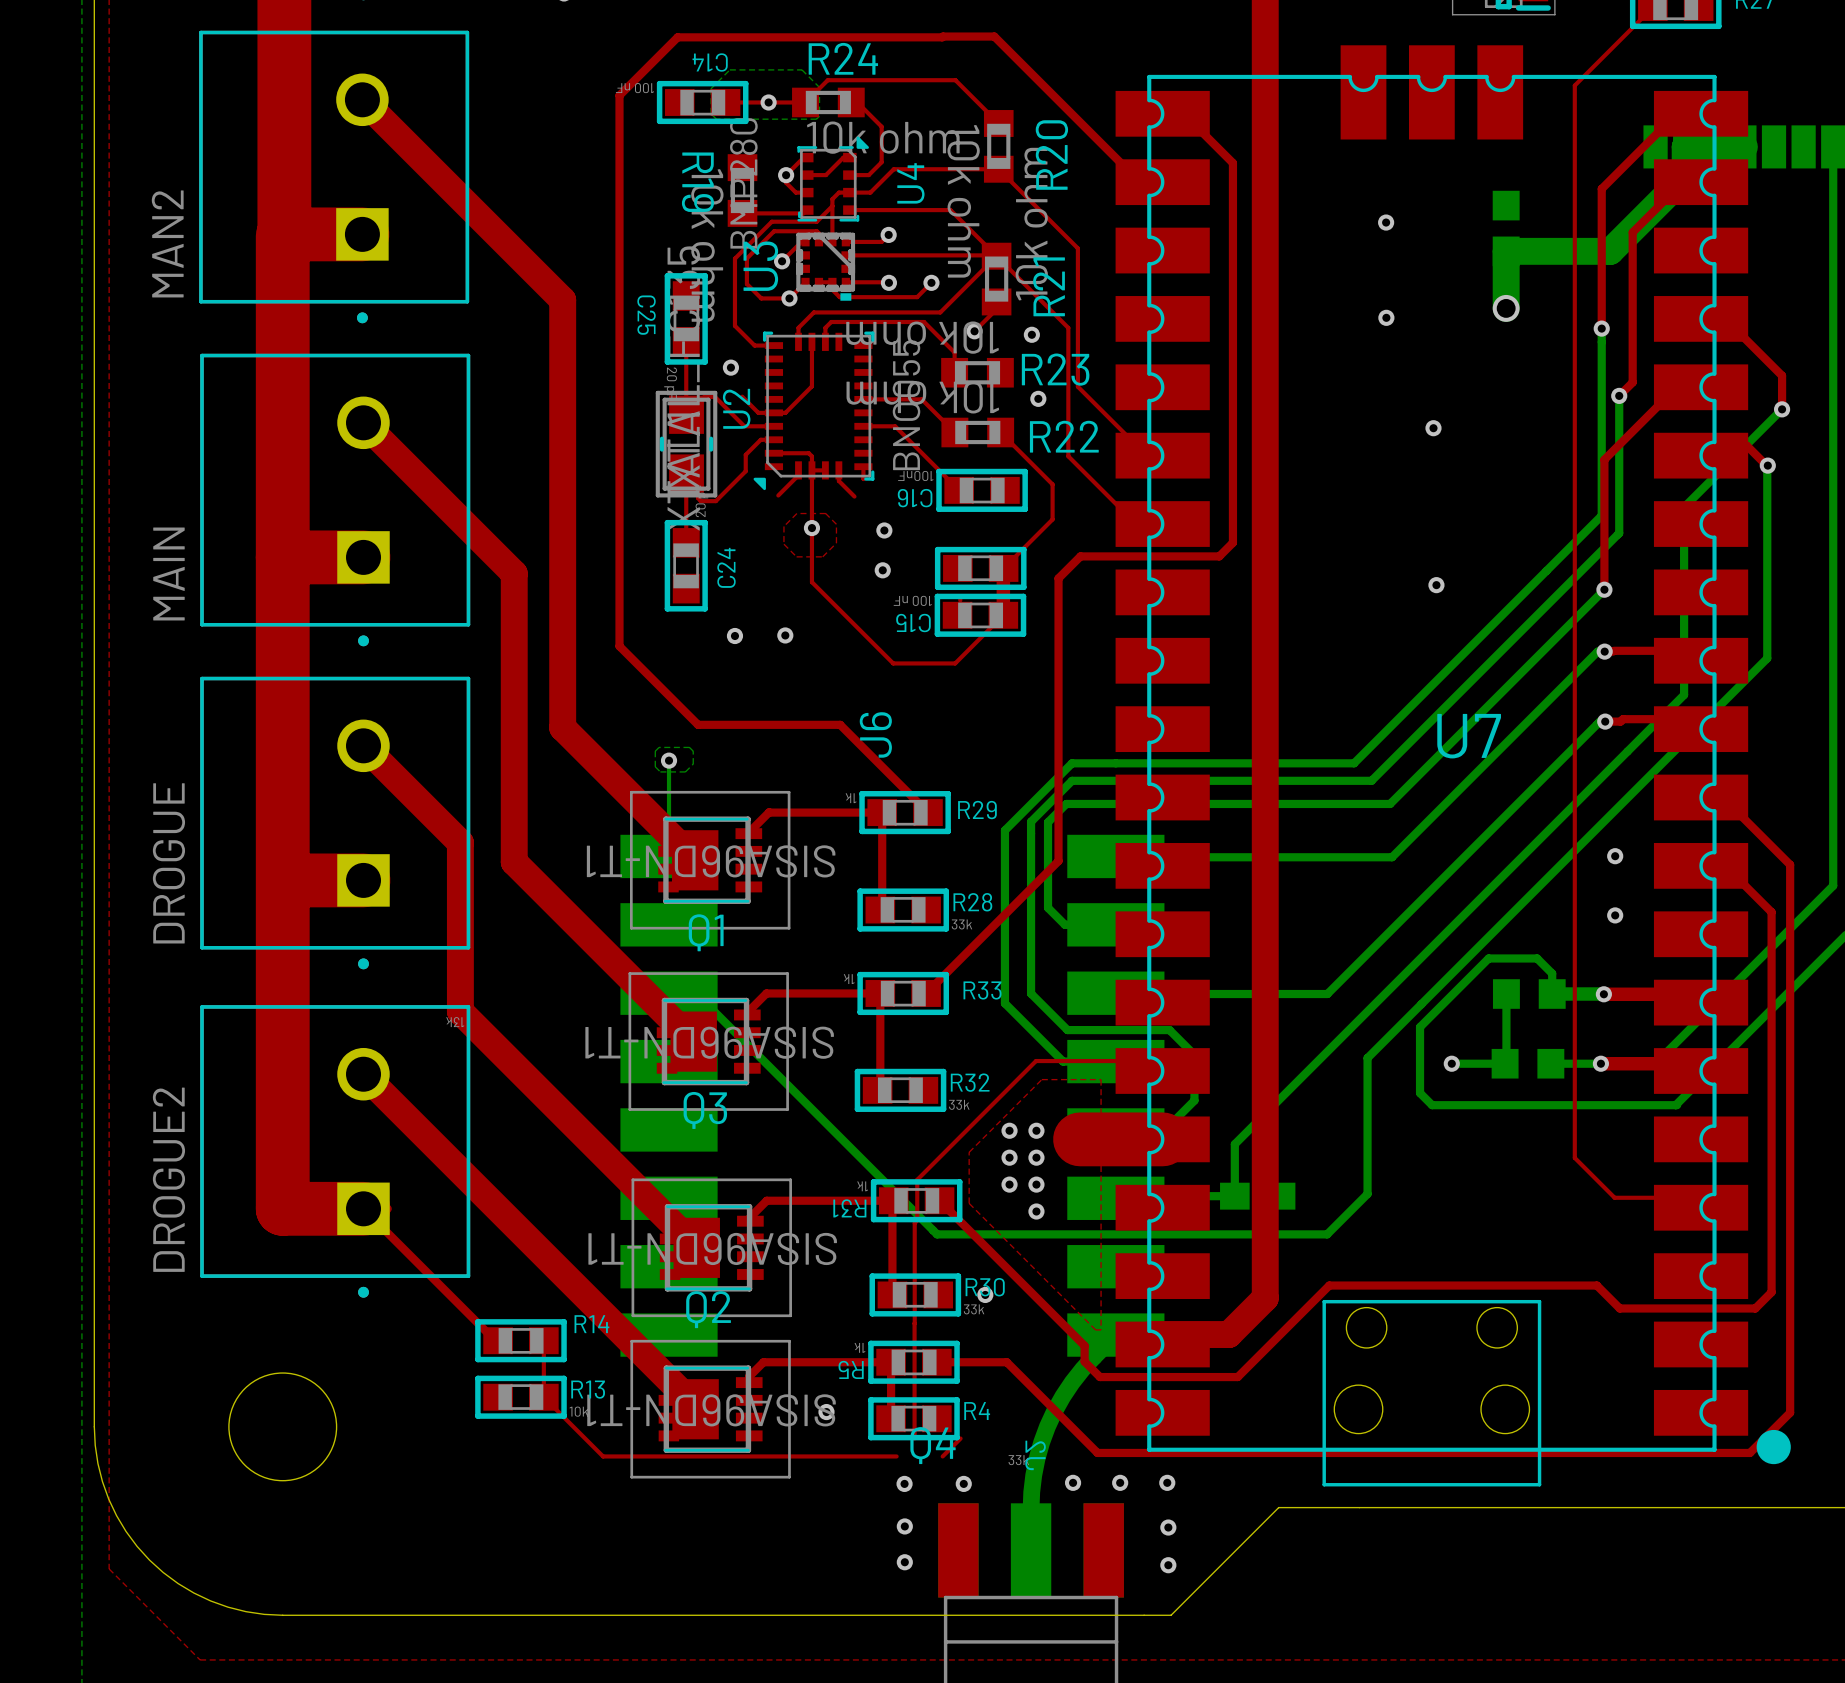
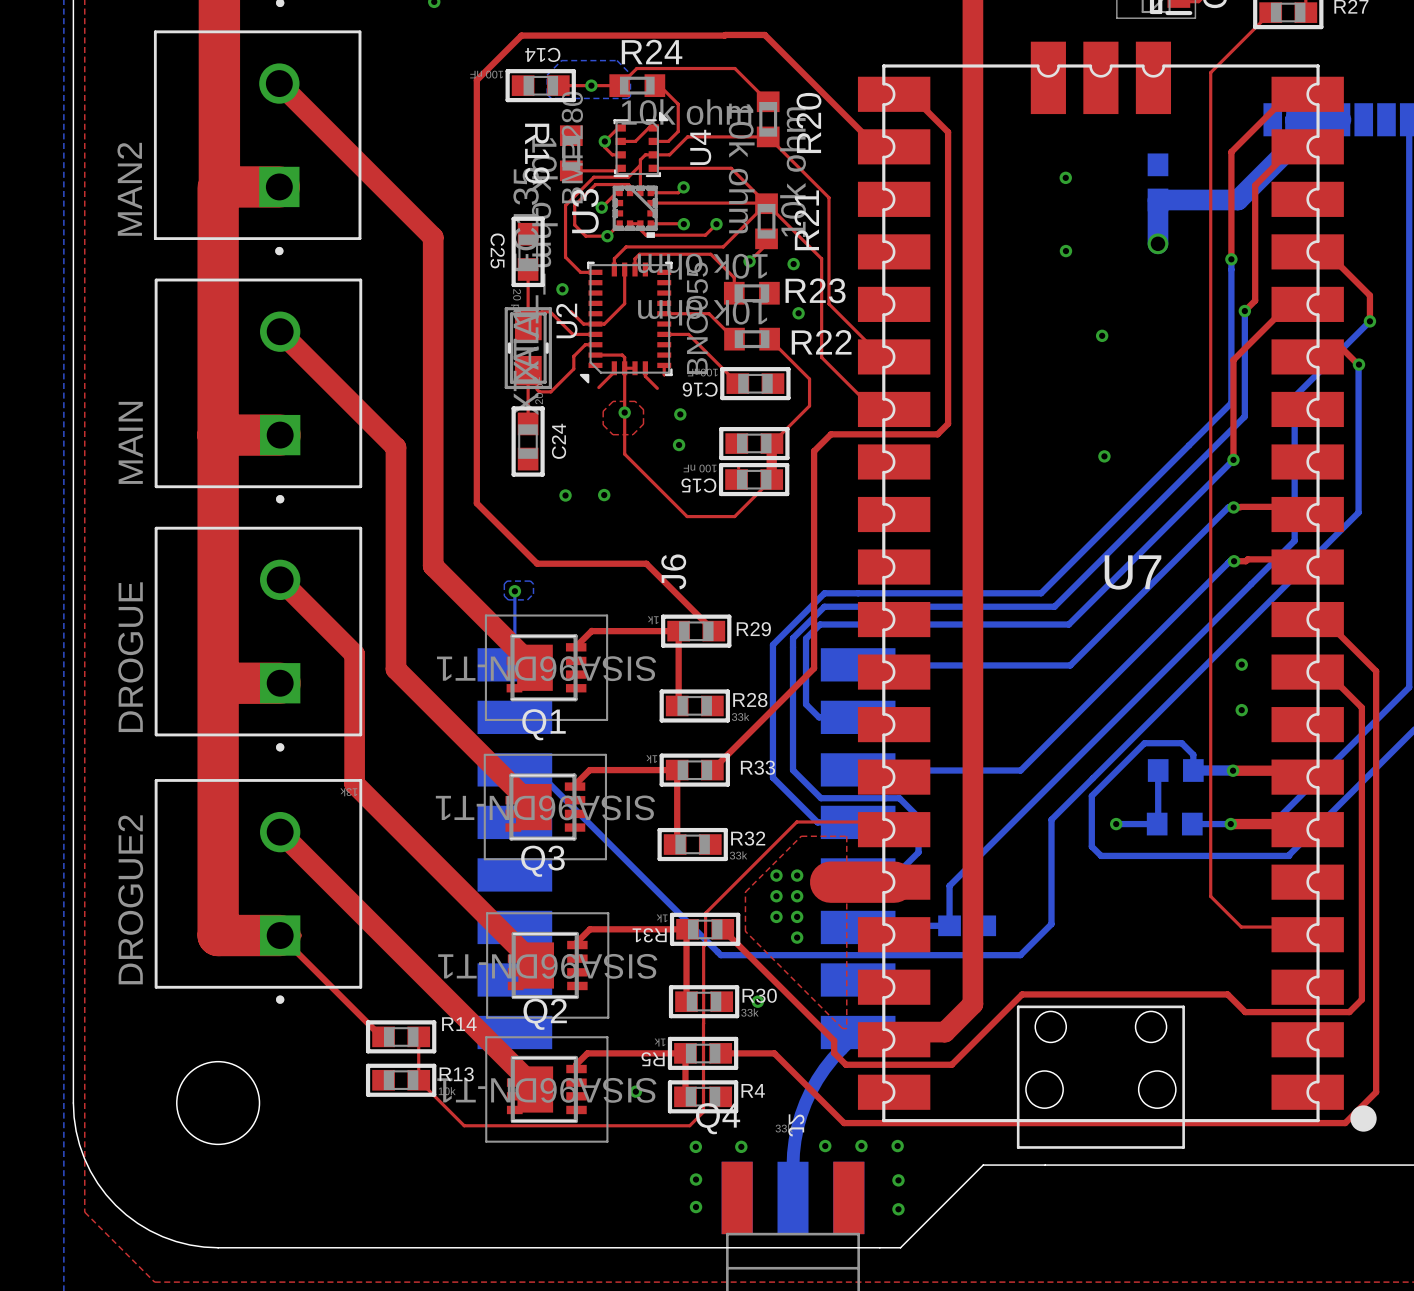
top track: (960, 1438) (942, 1456) -> (703, 1112) (689, 1125)

